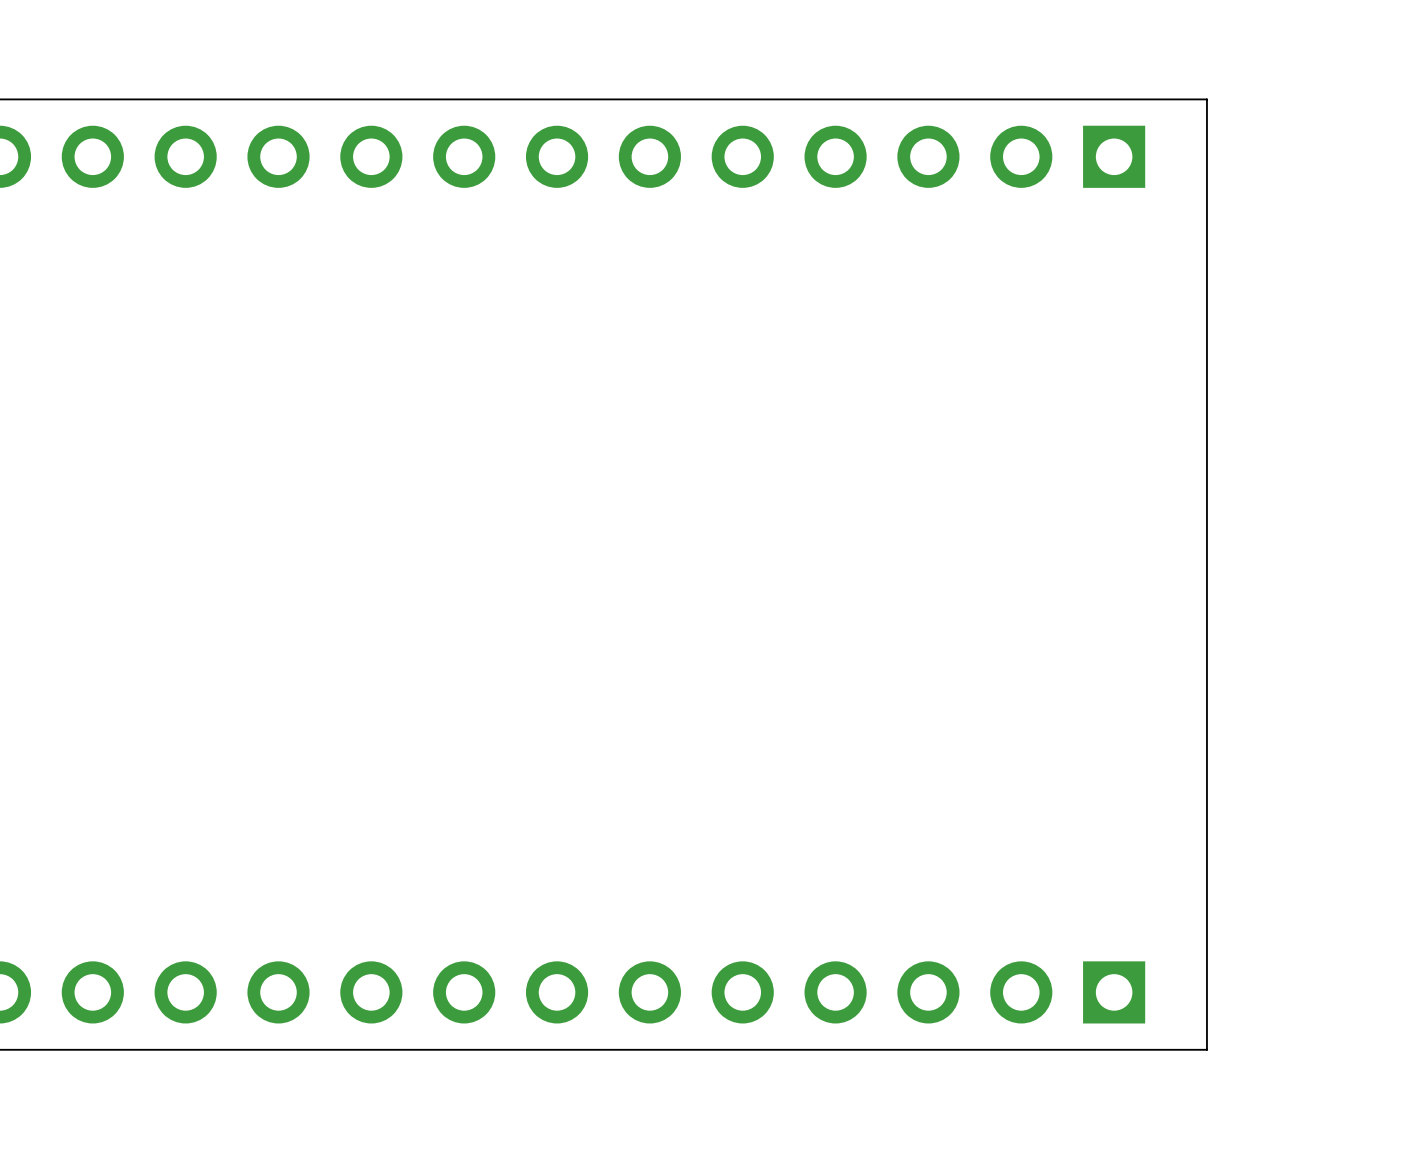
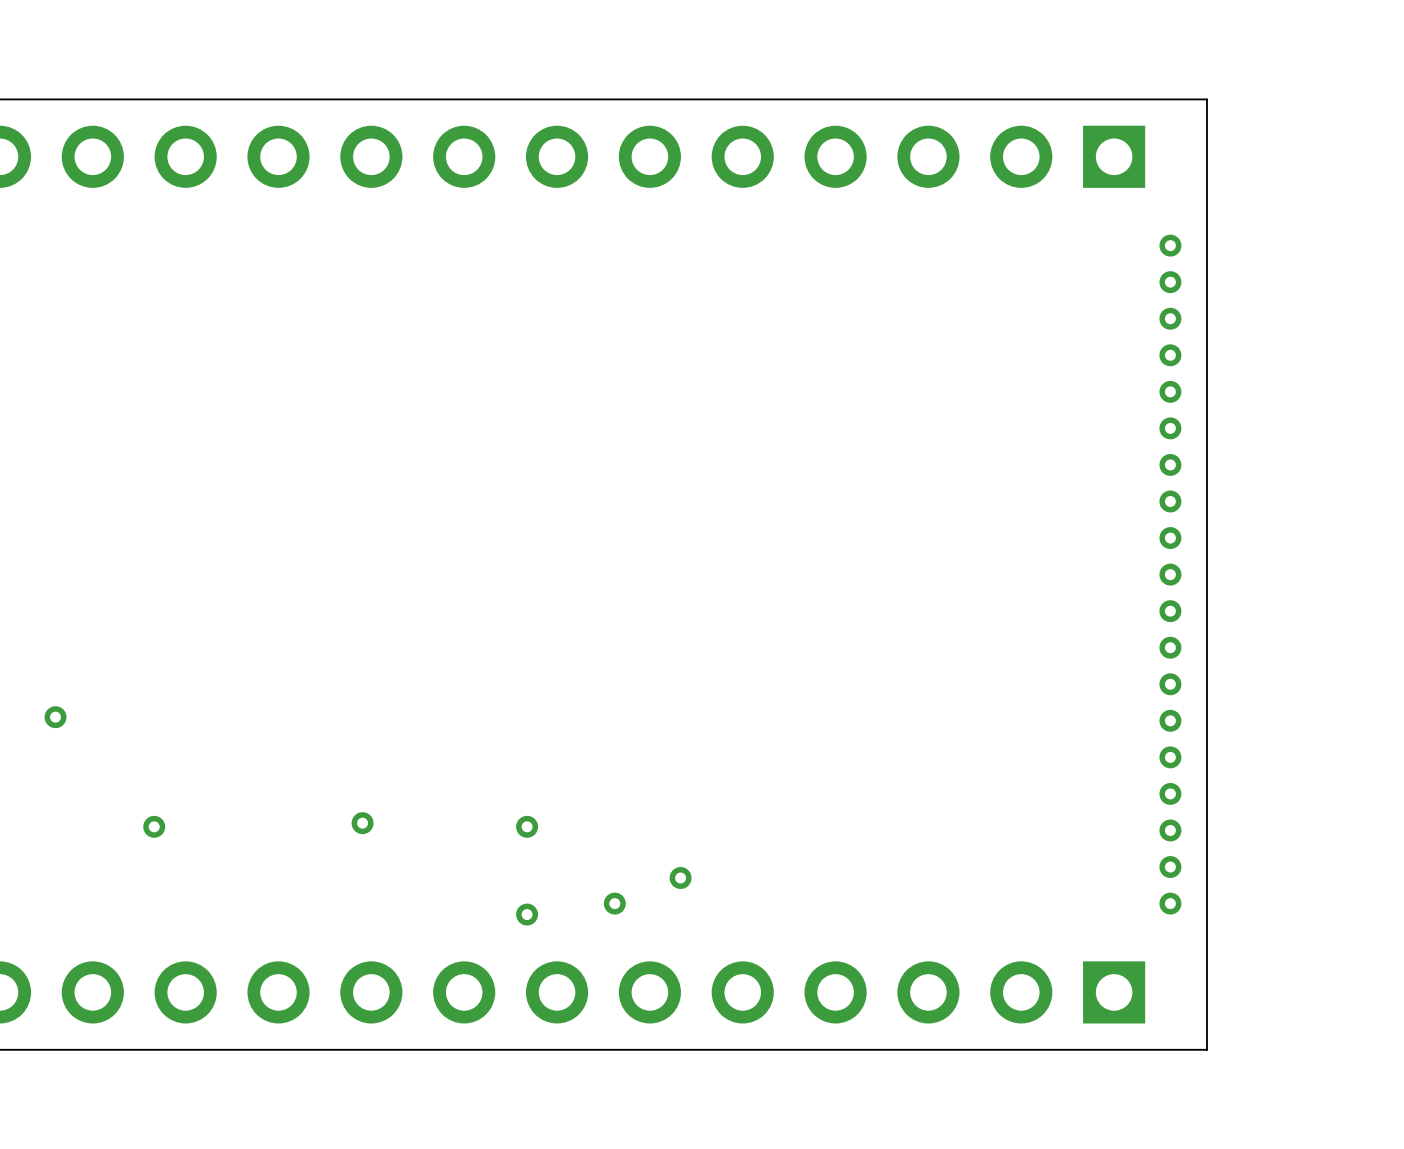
via: none -> (1170, 245)
via: none -> (1170, 282)
via: none -> (1170, 318)
via: none -> (1170, 355)
via: none -> (1170, 391)
via: none -> (1170, 428)
via: none -> (1170, 464)
via: none -> (1170, 501)
via: none -> (1170, 538)
via: none -> (1170, 574)
via: none -> (1170, 611)
via: none -> (1170, 647)
via: none -> (1170, 684)
via: none -> (55, 717)
via: none -> (1170, 720)
via: none -> (1170, 757)
via: none -> (1170, 793)
via: none -> (362, 823)
via: none -> (154, 826)
via: none -> (527, 826)
via: none -> (1170, 830)
via: none -> (1170, 867)
via: none -> (680, 878)
via: none -> (614, 903)
via: none -> (1170, 903)
via: none -> (527, 914)

